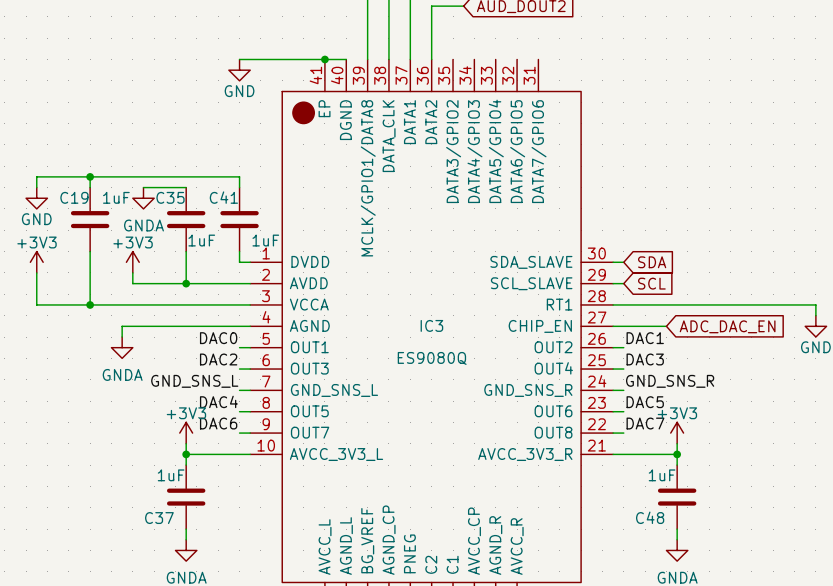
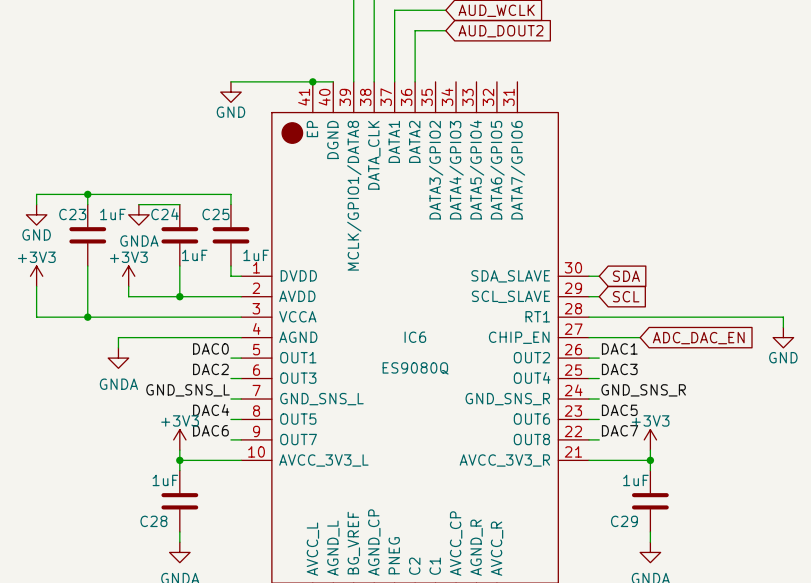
C19 name: C19 (74, 197) -> C23 (72, 214)
C35 name: C35 (170, 197) -> C24 (165, 214)
C41 name: C41 (223, 197) -> C25 (215, 214)
IC3 name: IC3 (431, 325) -> IC6 (415, 337)
C48 name: C48 (650, 517) -> C29 (624, 521)
C37 name: C37 (159, 518) -> C28 (153, 521)

